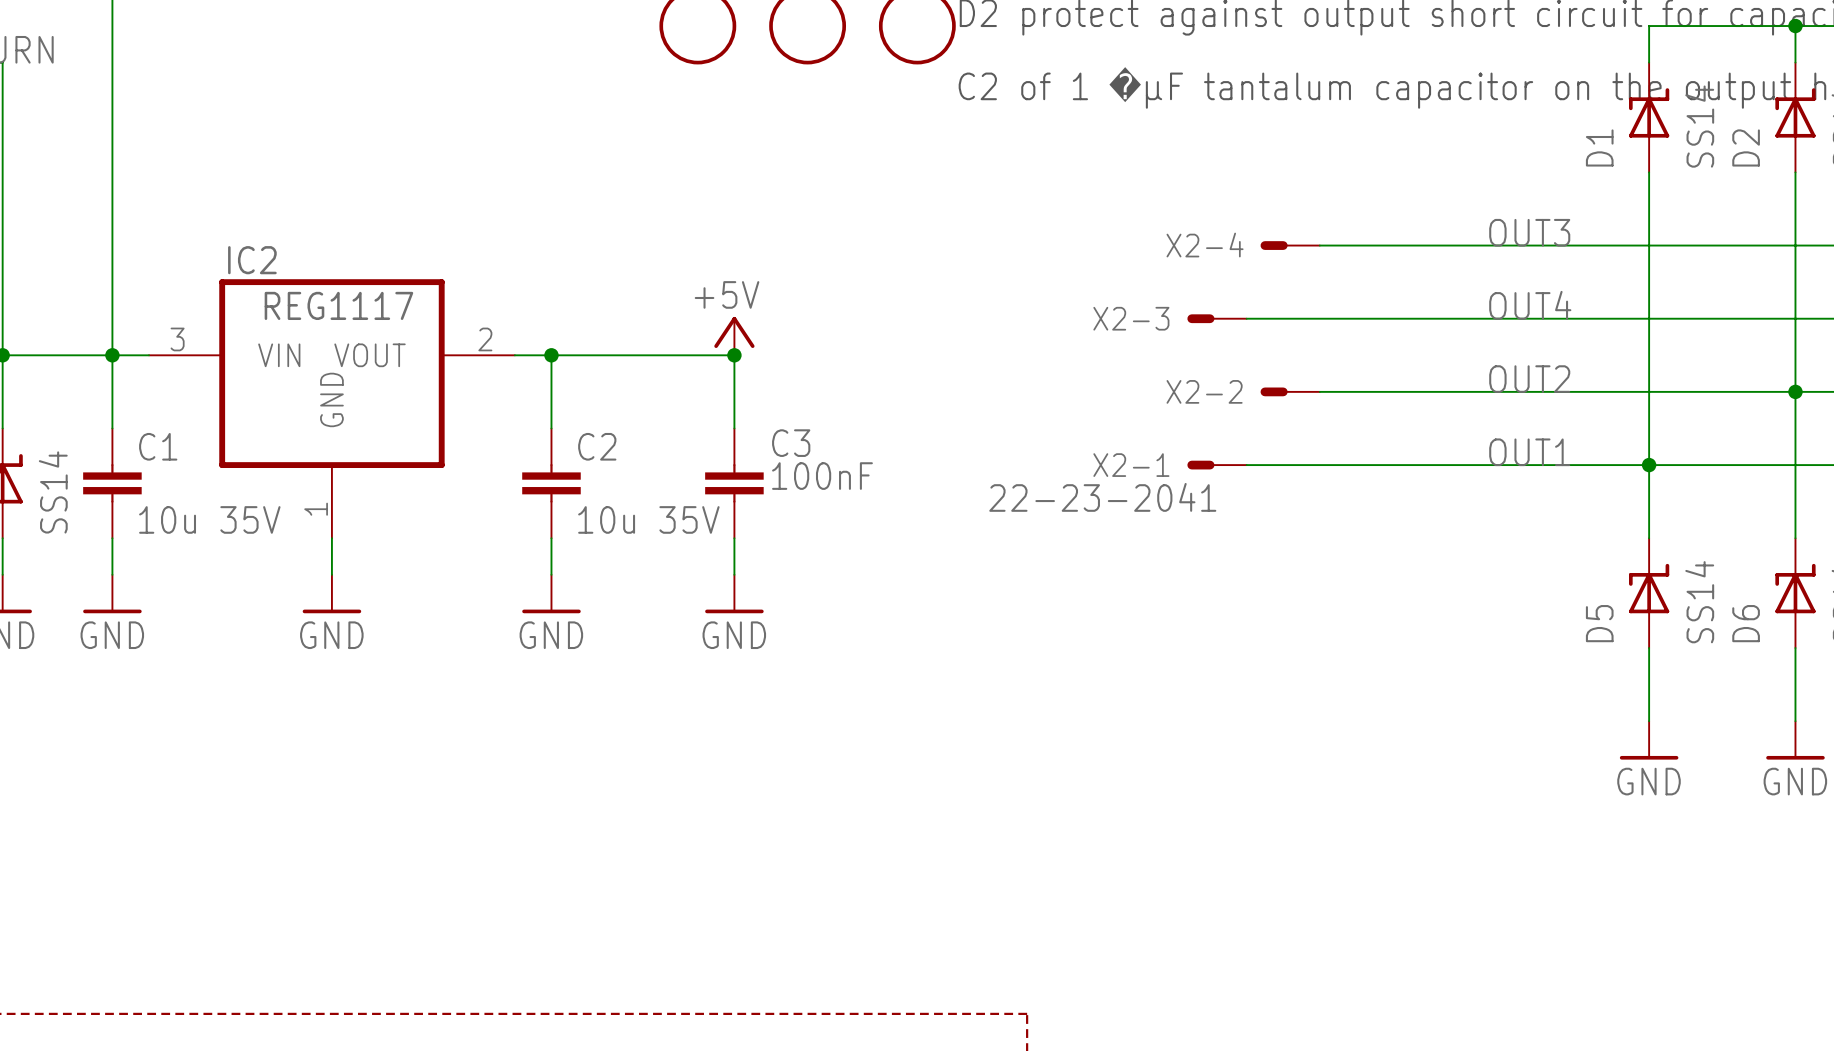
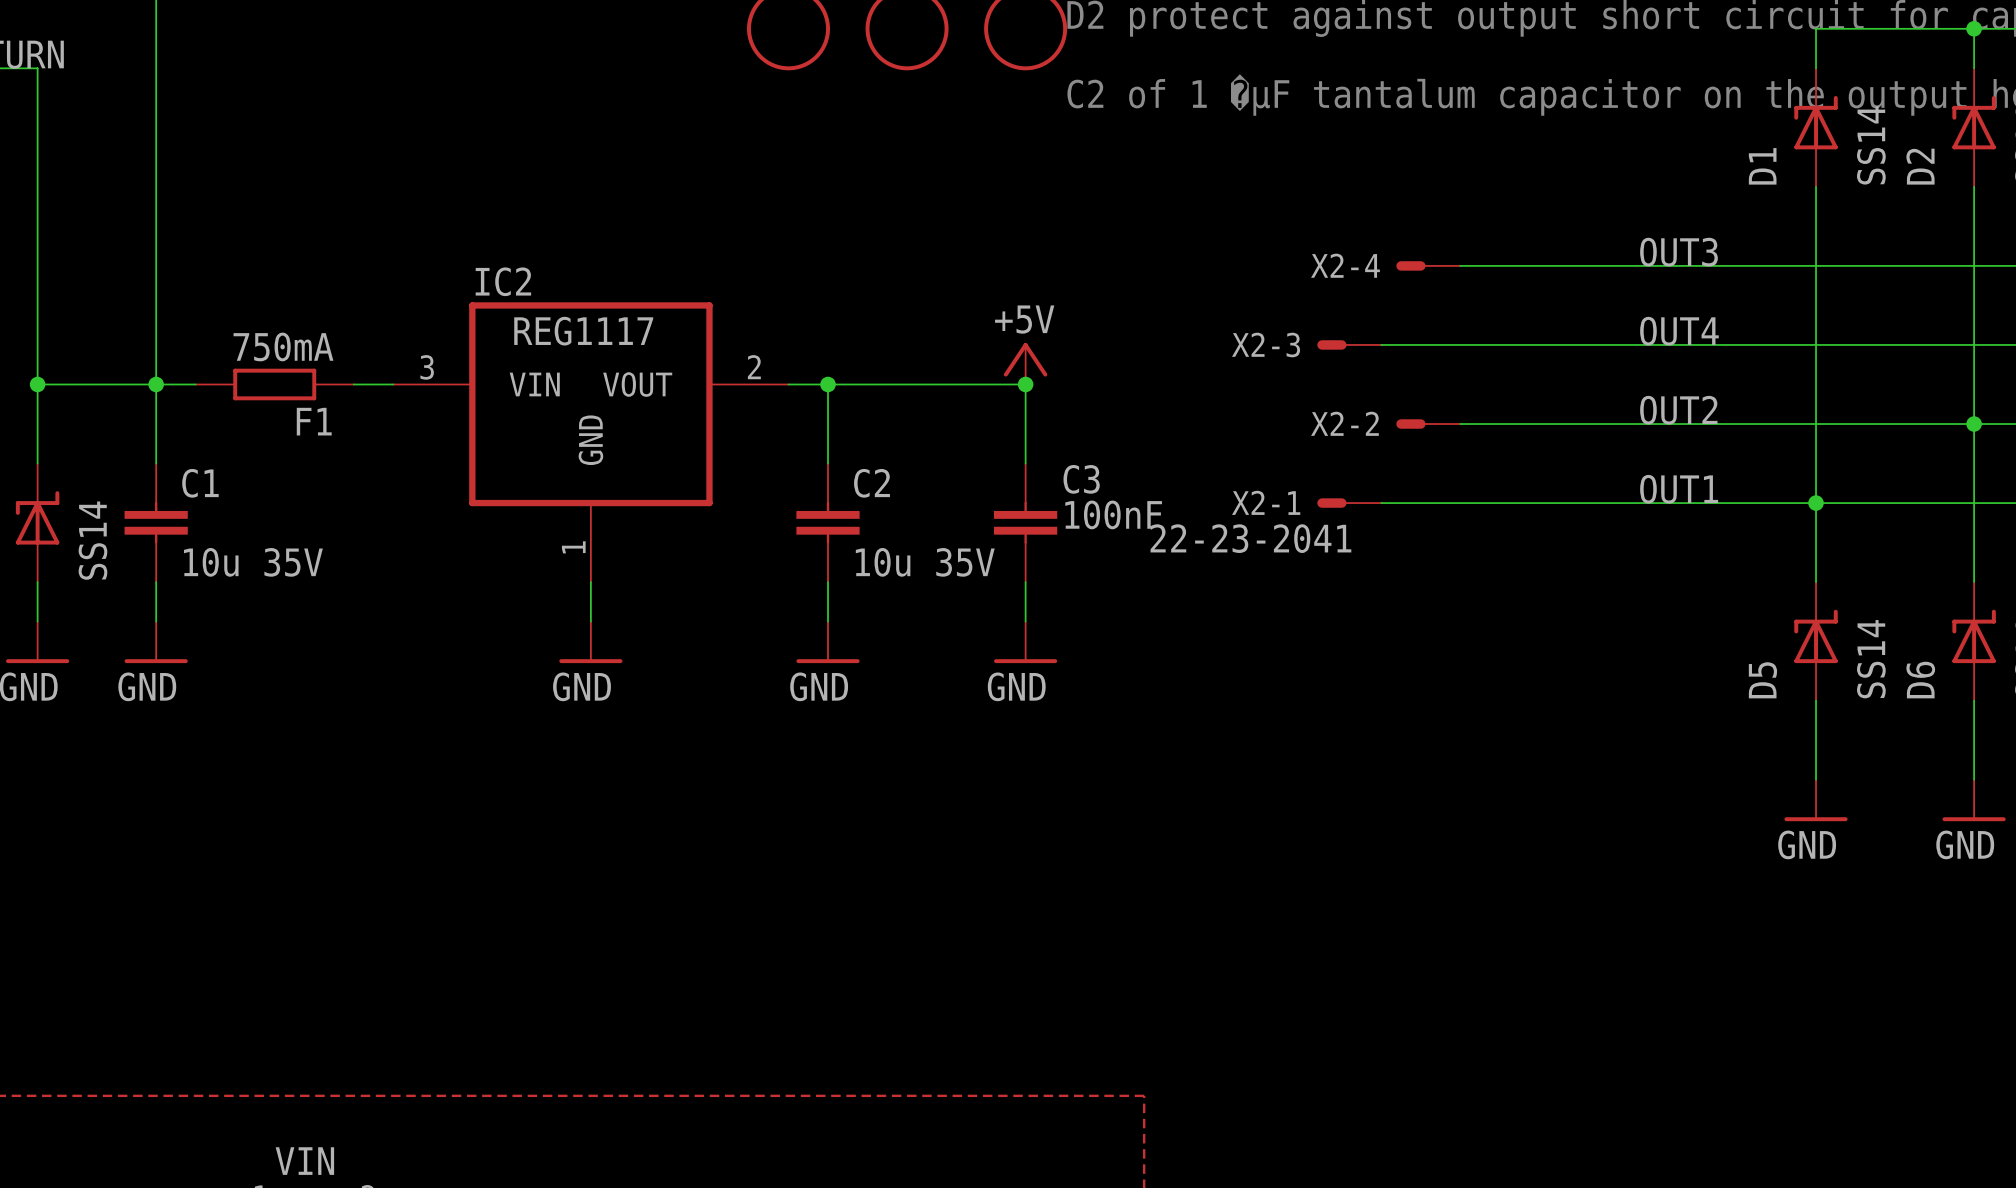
power symbol position: +5V (734, 336) -> +5V (1025, 363)
F1: none -> 750mA (274, 384)
wire: none -> (353, 384) (393, 384)
wire: (514, 355) (697, 355) -> none
wire: (551, 355) (551, 428) -> none
junction: (551, 355) -> none
wire: none -> (828, 384) (1025, 384) (1025, 463)
junction: none -> (1025, 384)
IC2 position: (331, 408) -> (590, 442)
C3 name: C3 (791, 443) -> C2 (871, 483)
C3 value: 100nF (822, 476) -> 10u 35V (925, 562)
C2: 10u 35V (551, 483) -> none
C3: none -> 100nF (1025, 522)
wire: (331, 538) (331, 574) -> none
wire: (551, 538) (551, 574) -> (590, 582) (590, 621)
wire: none -> (1025, 582) (1025, 621)
power symbol: GND (331, 594) -> none
power symbol position: GND (551, 594) -> GND (590, 642)
power symbol: none -> GND (1025, 642)

